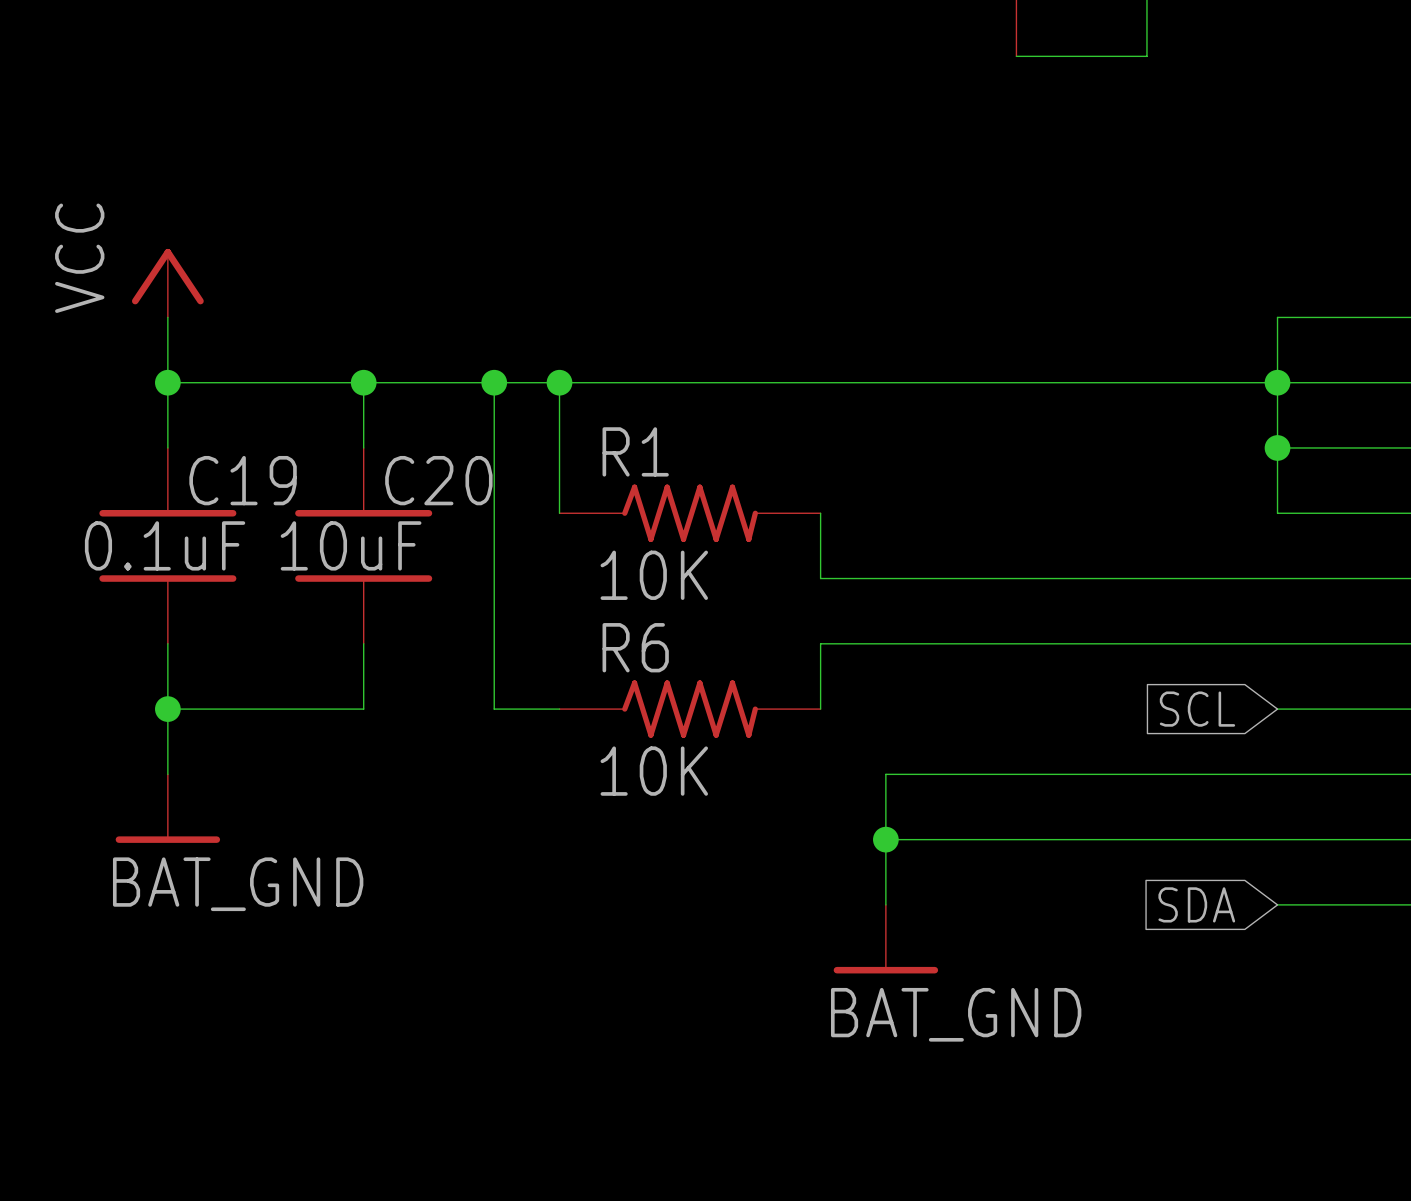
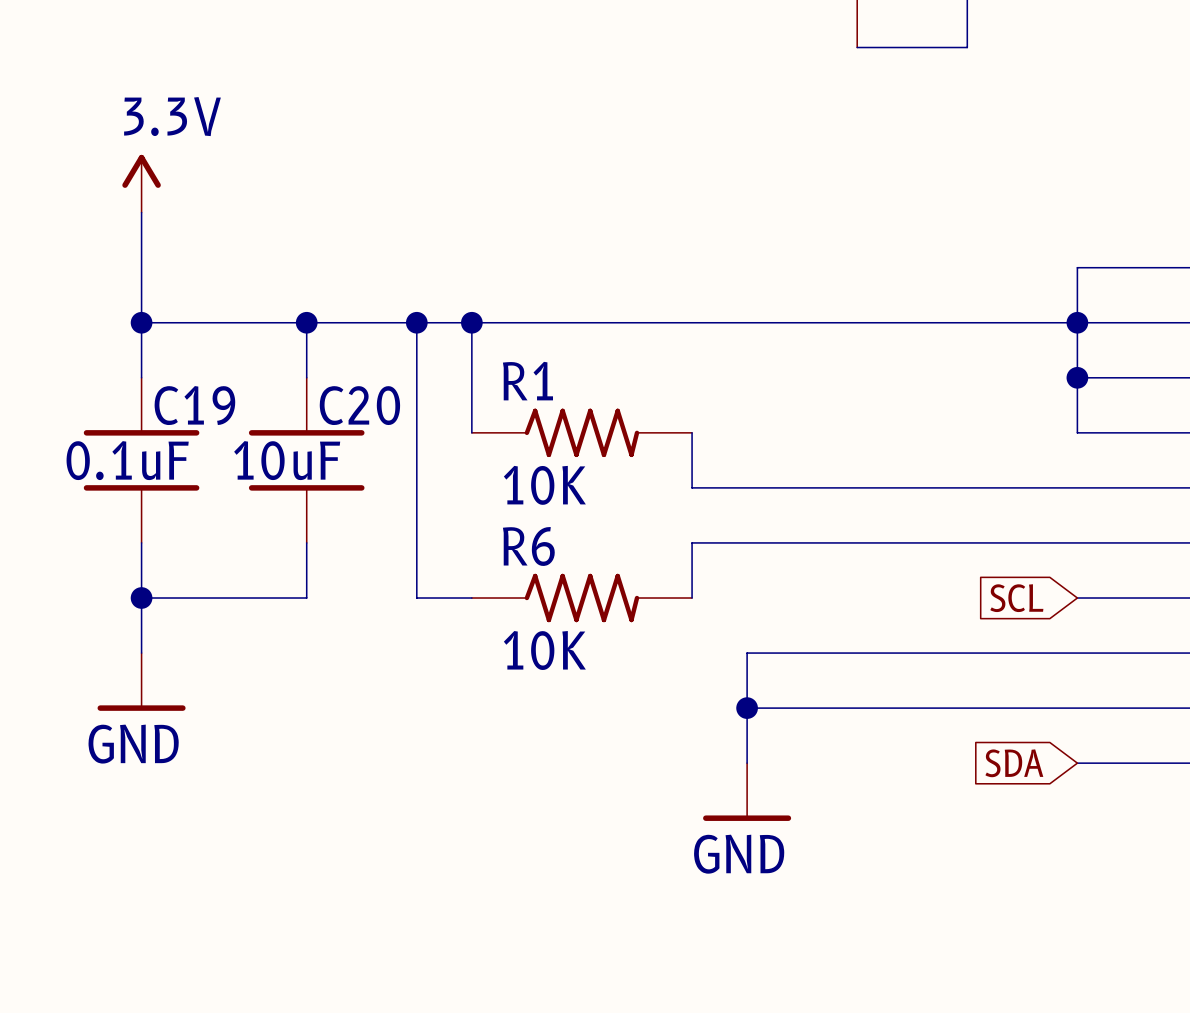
power symbol: none -> 3.3V (141, 183)
power symbol: VCC (167, 283) -> none
power symbol: BAT_GND (167, 808) -> GND (141, 681)
power symbol: BAT_GND (885, 939) -> GND (747, 792)

